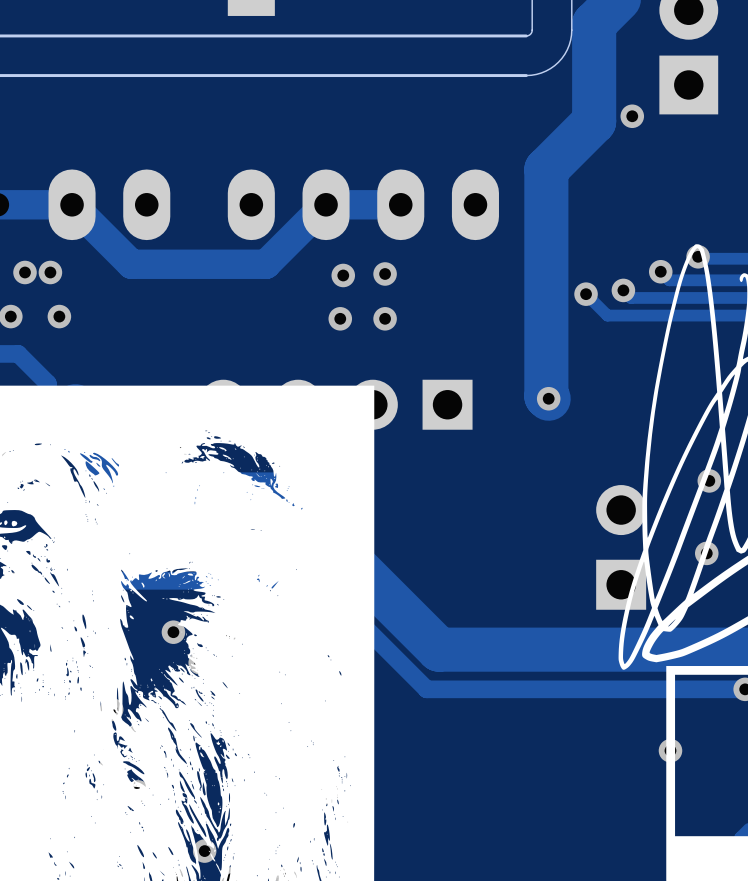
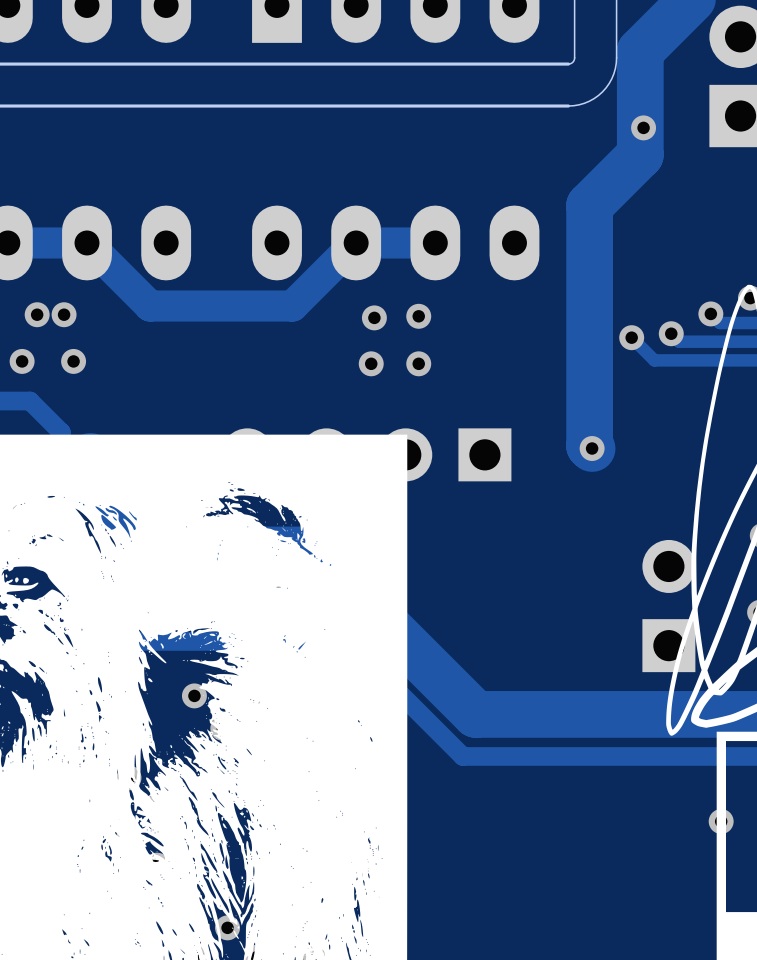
via position: (632, 116) -> (643, 127)

